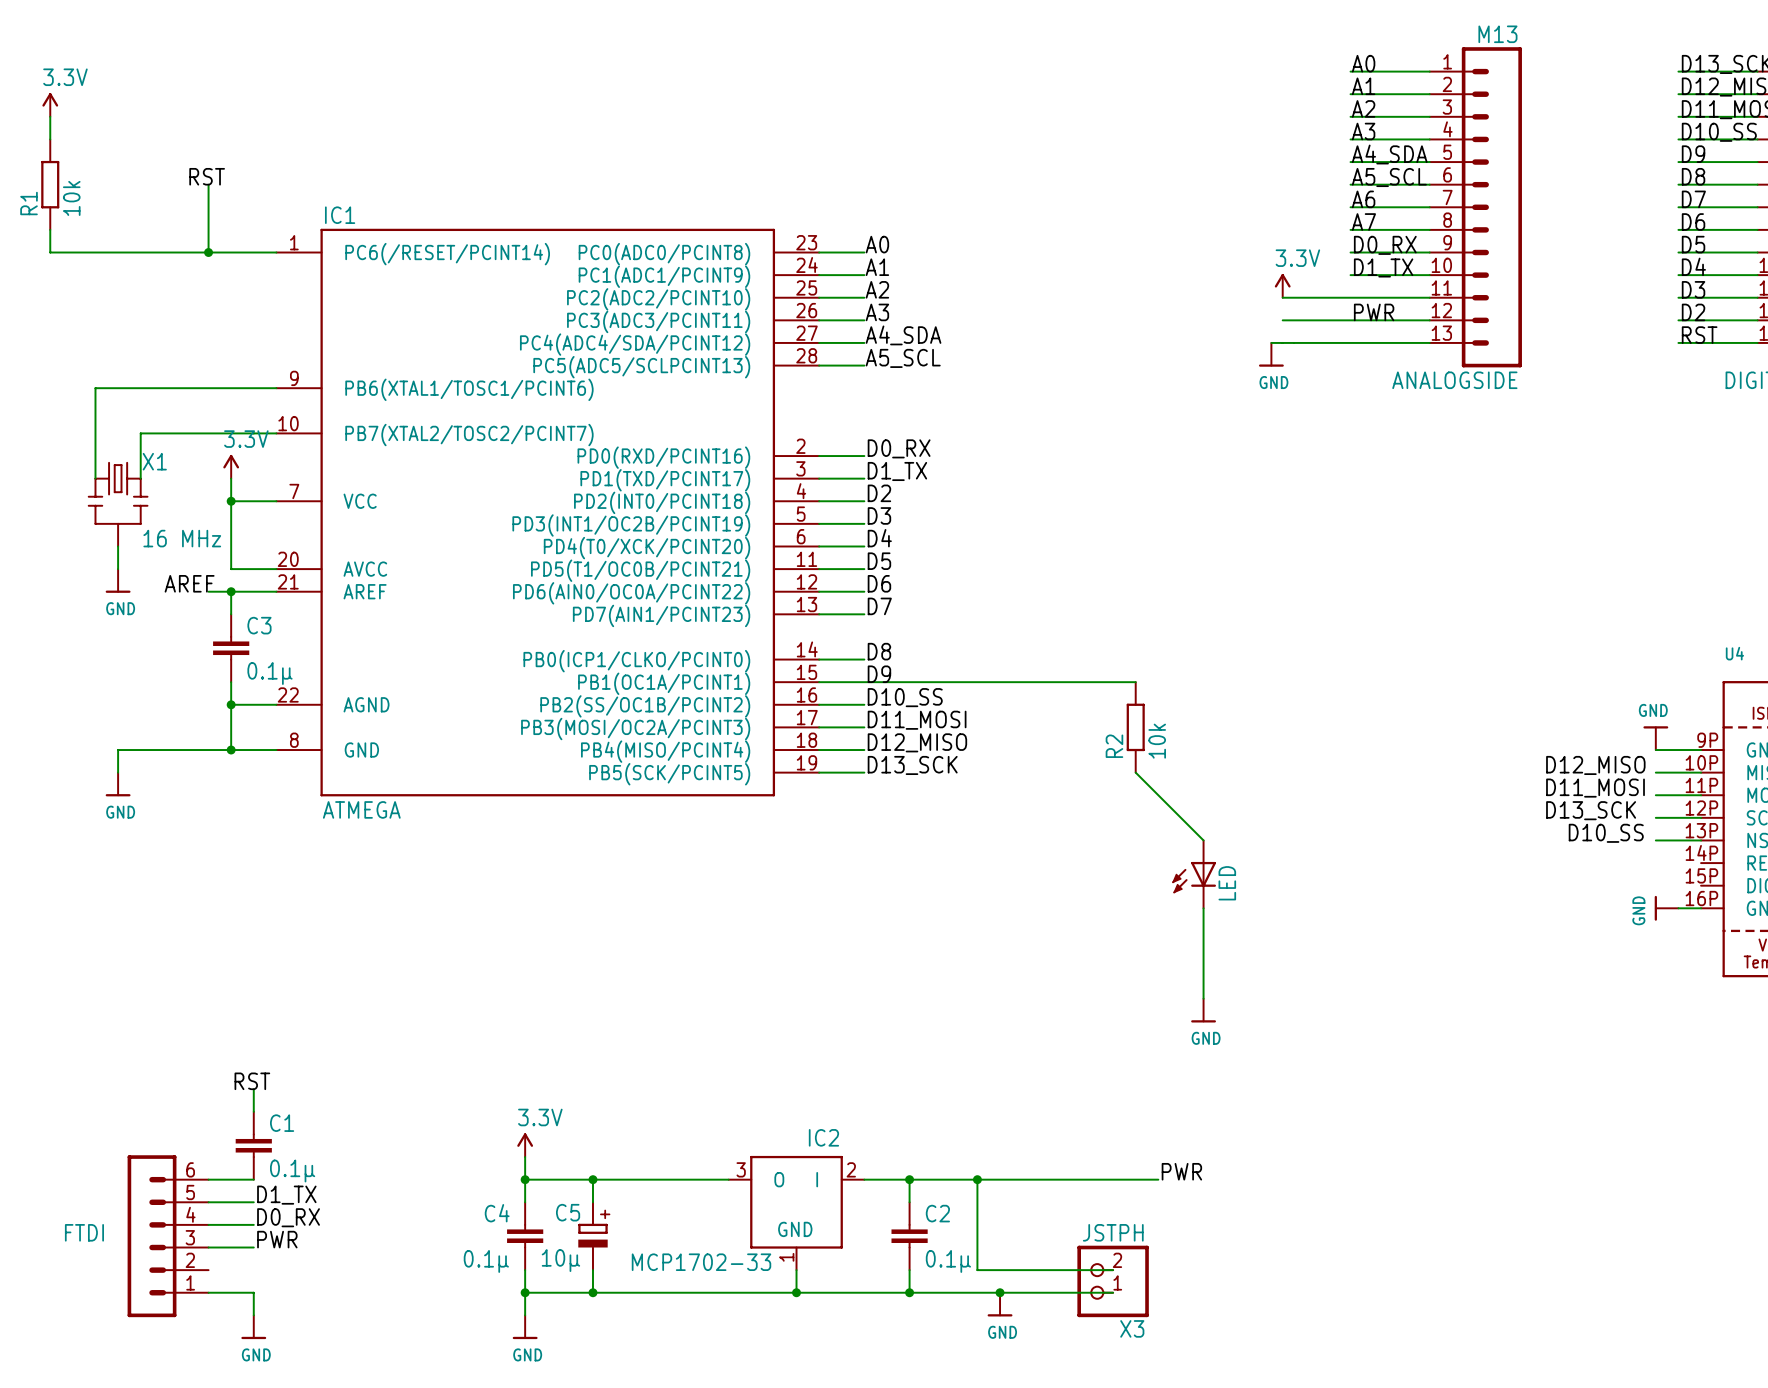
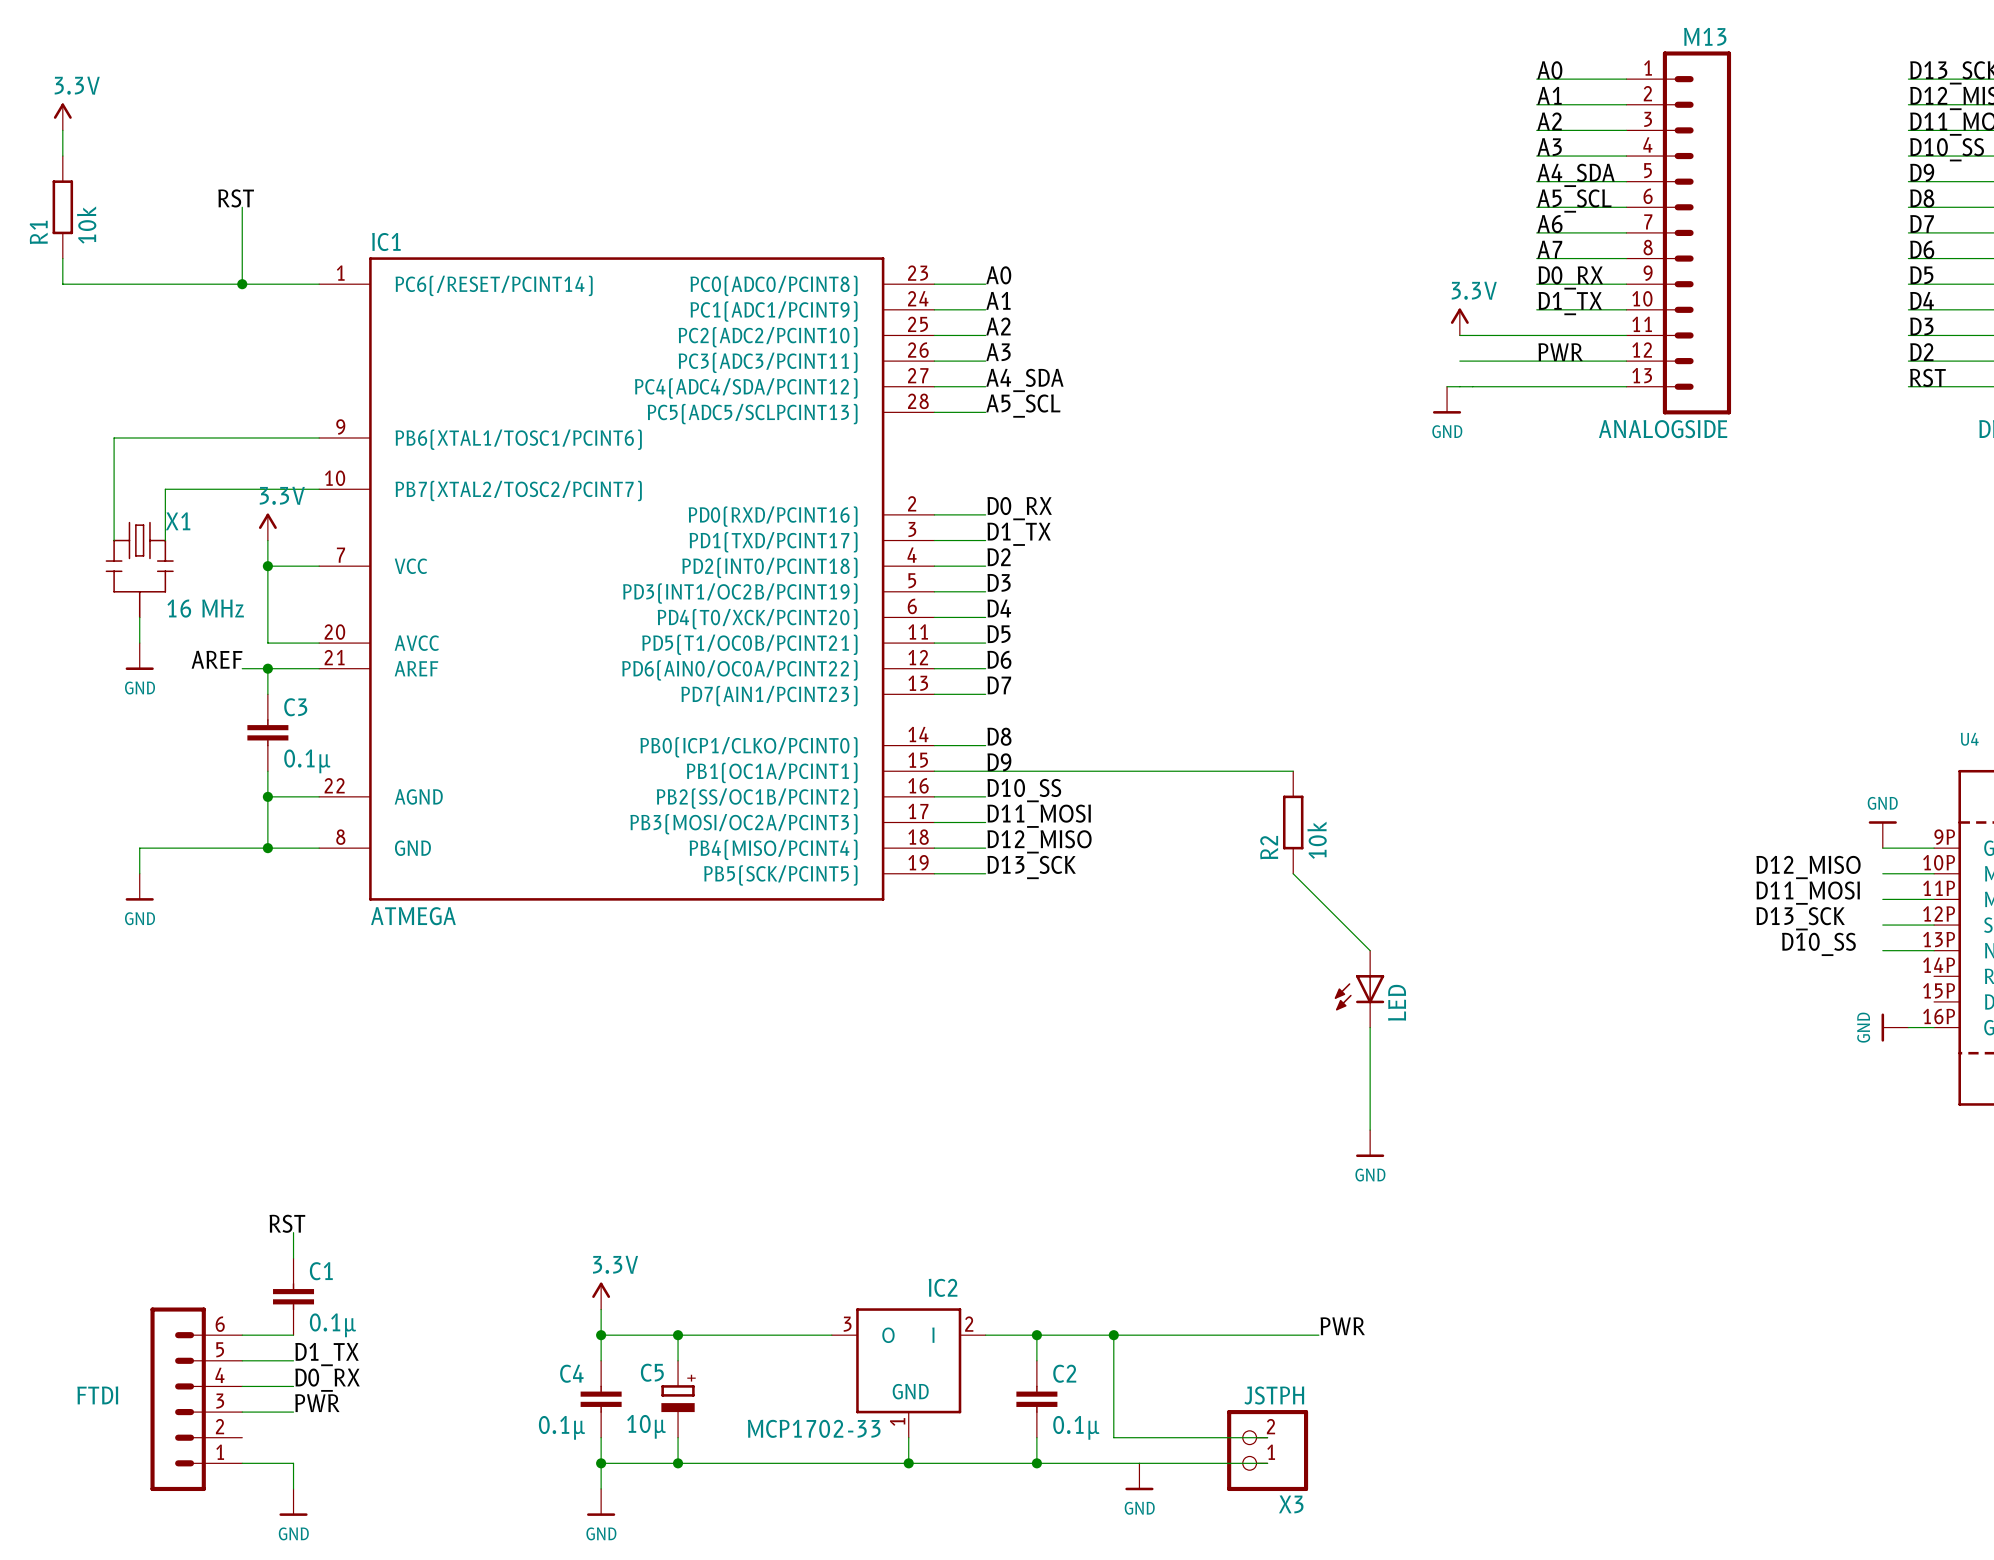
junction: (1000, 1292) -> none

